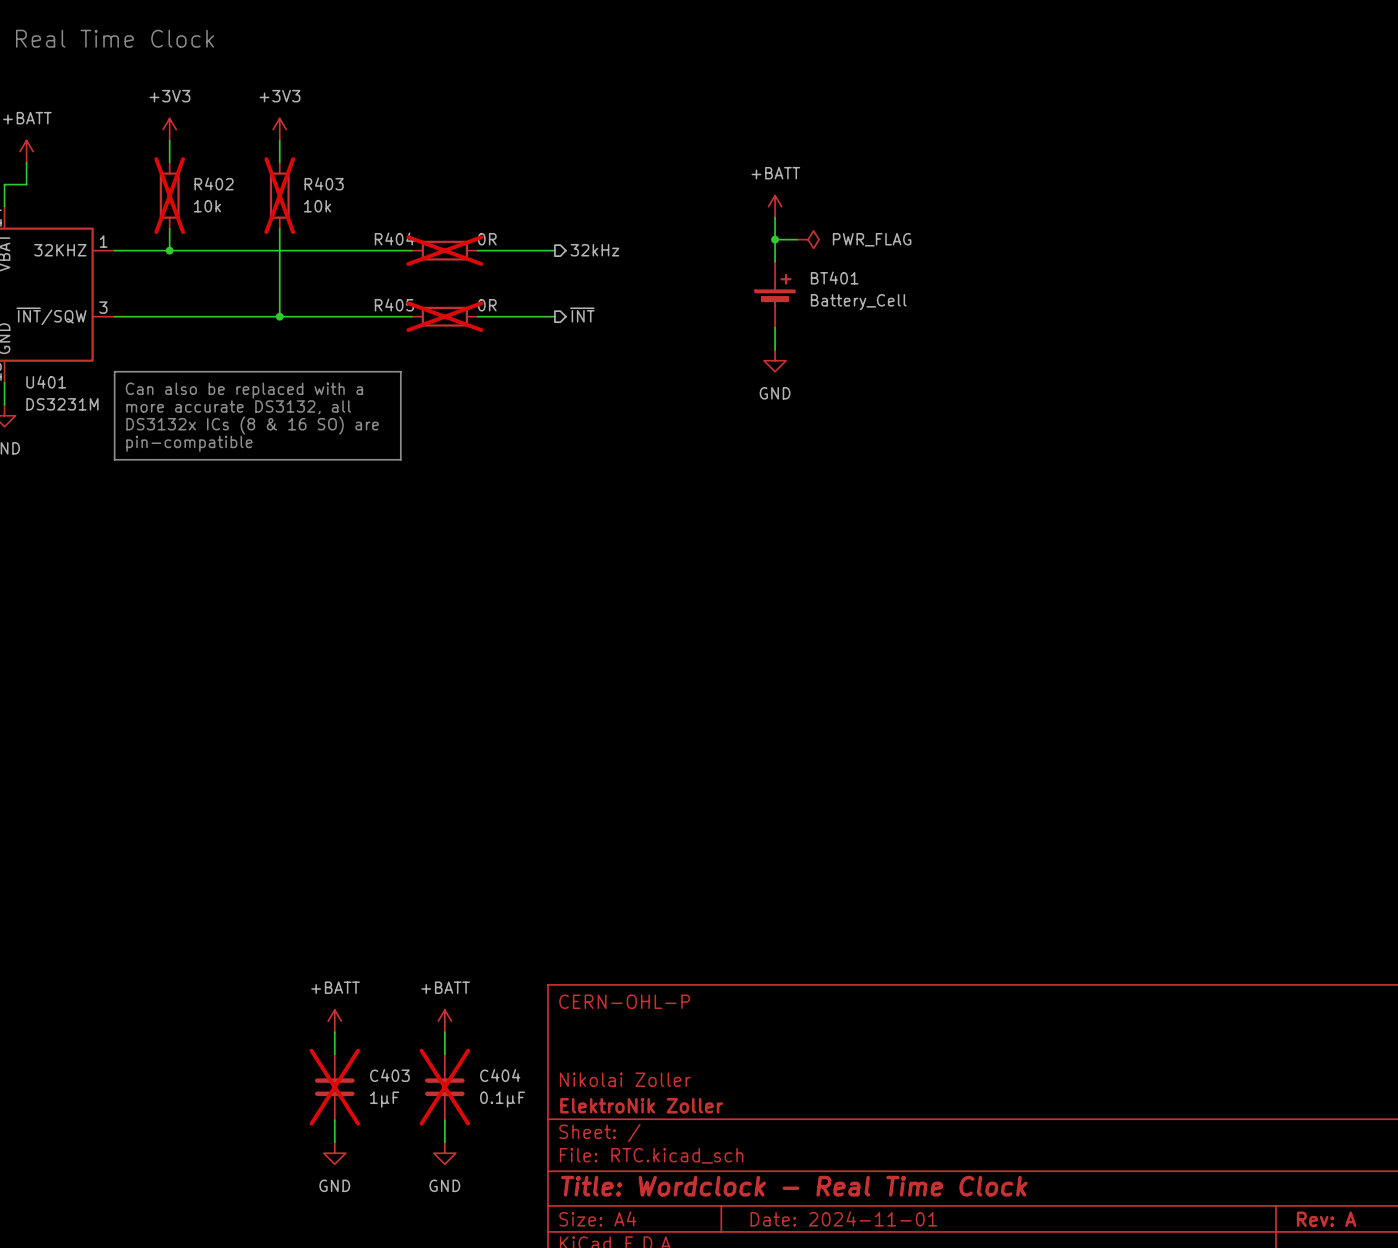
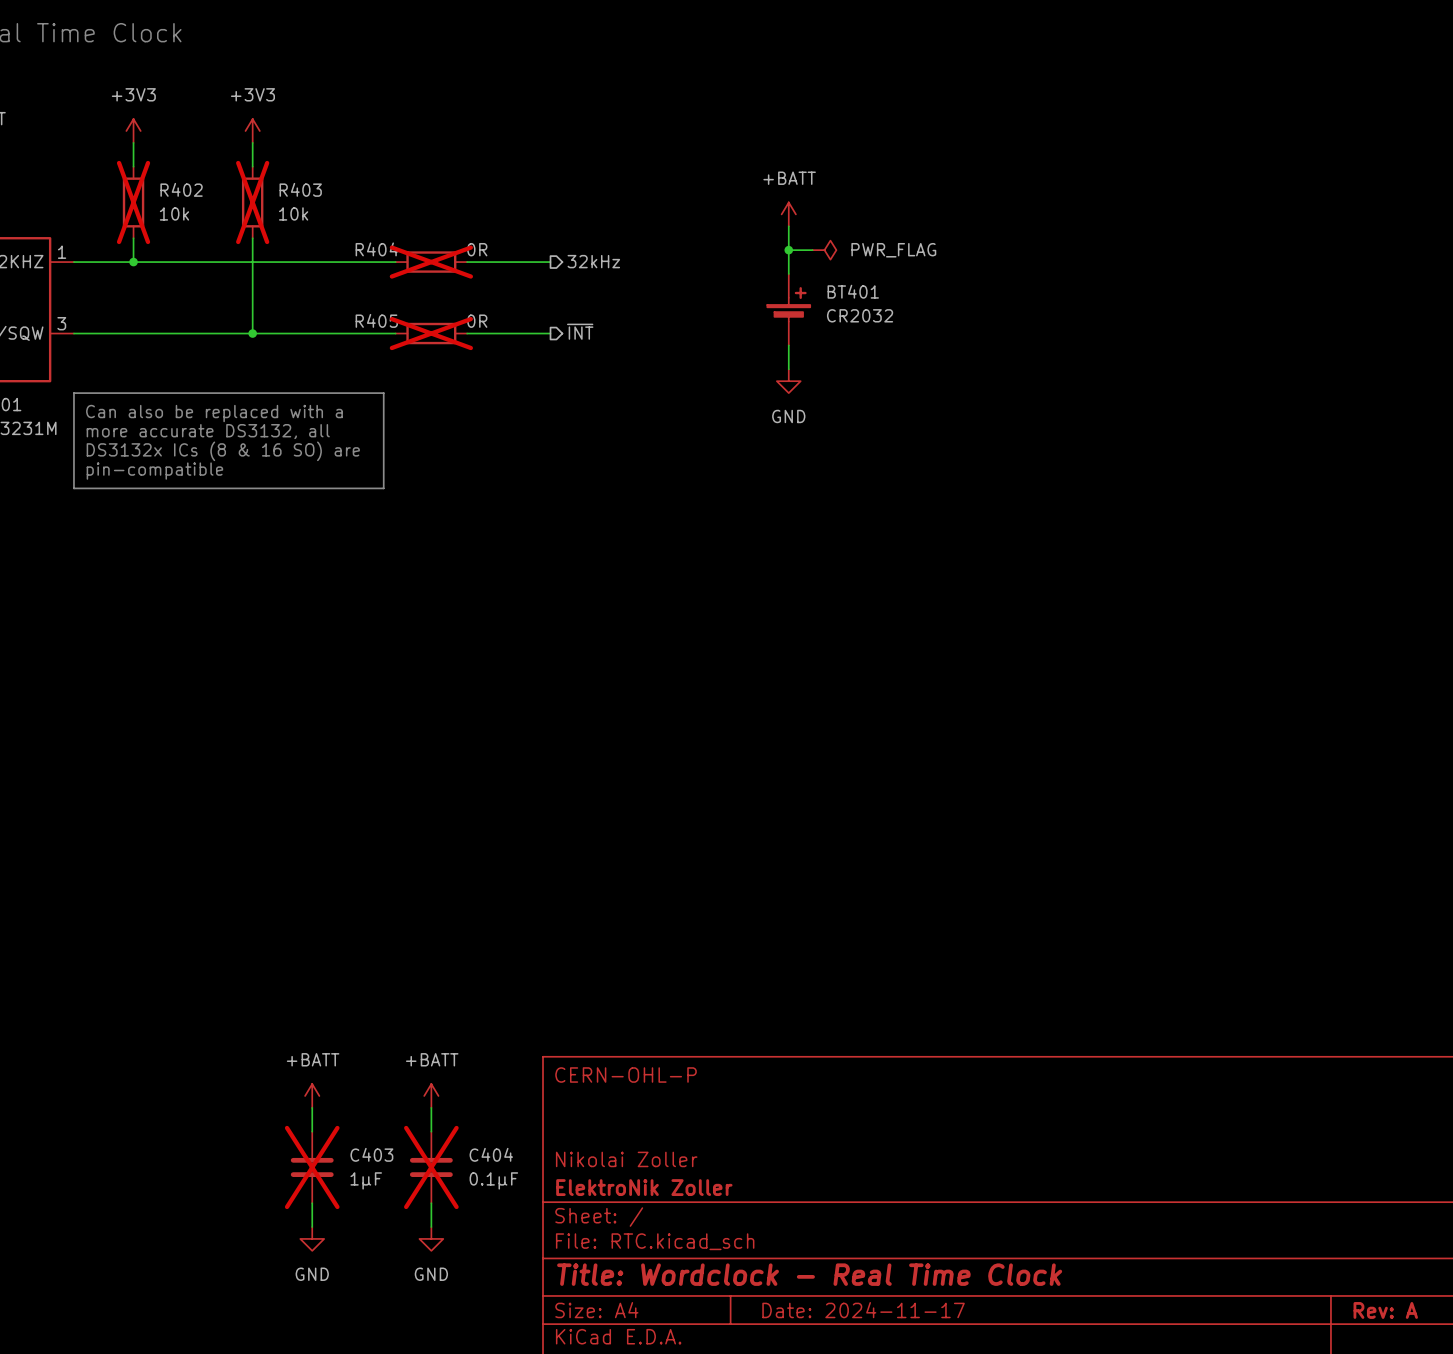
BT401 value: Battery_Cell (858, 302) -> CR2032 (860, 315)
title block: Date: 2024-11-01 (843, 1218) -> Date: 2024-11-17 (863, 1310)

